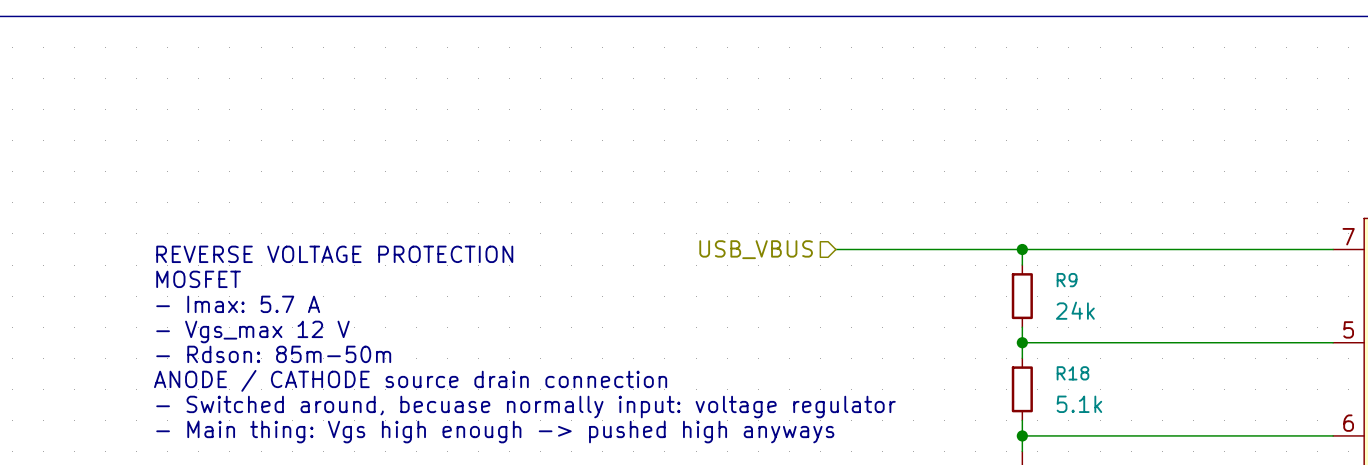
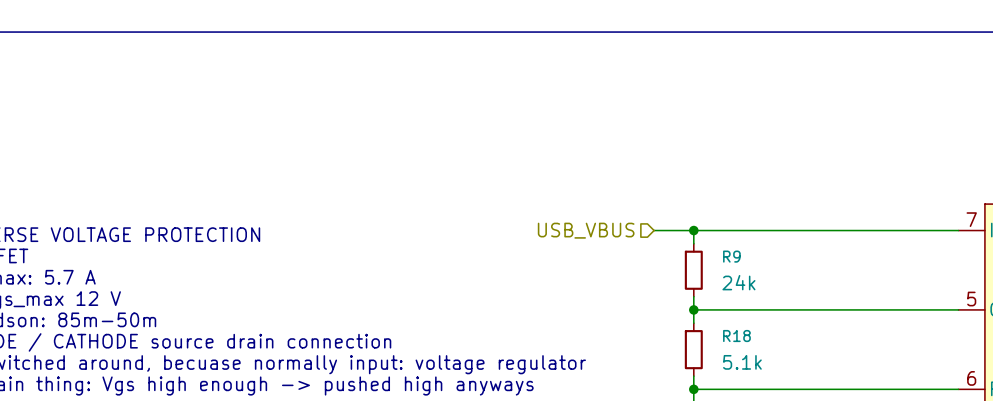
hierarchical label position: USB_VBUS (756, 249) -> USB_VBUS (586, 230)
wire: (835, 249) (975, 249) -> none

